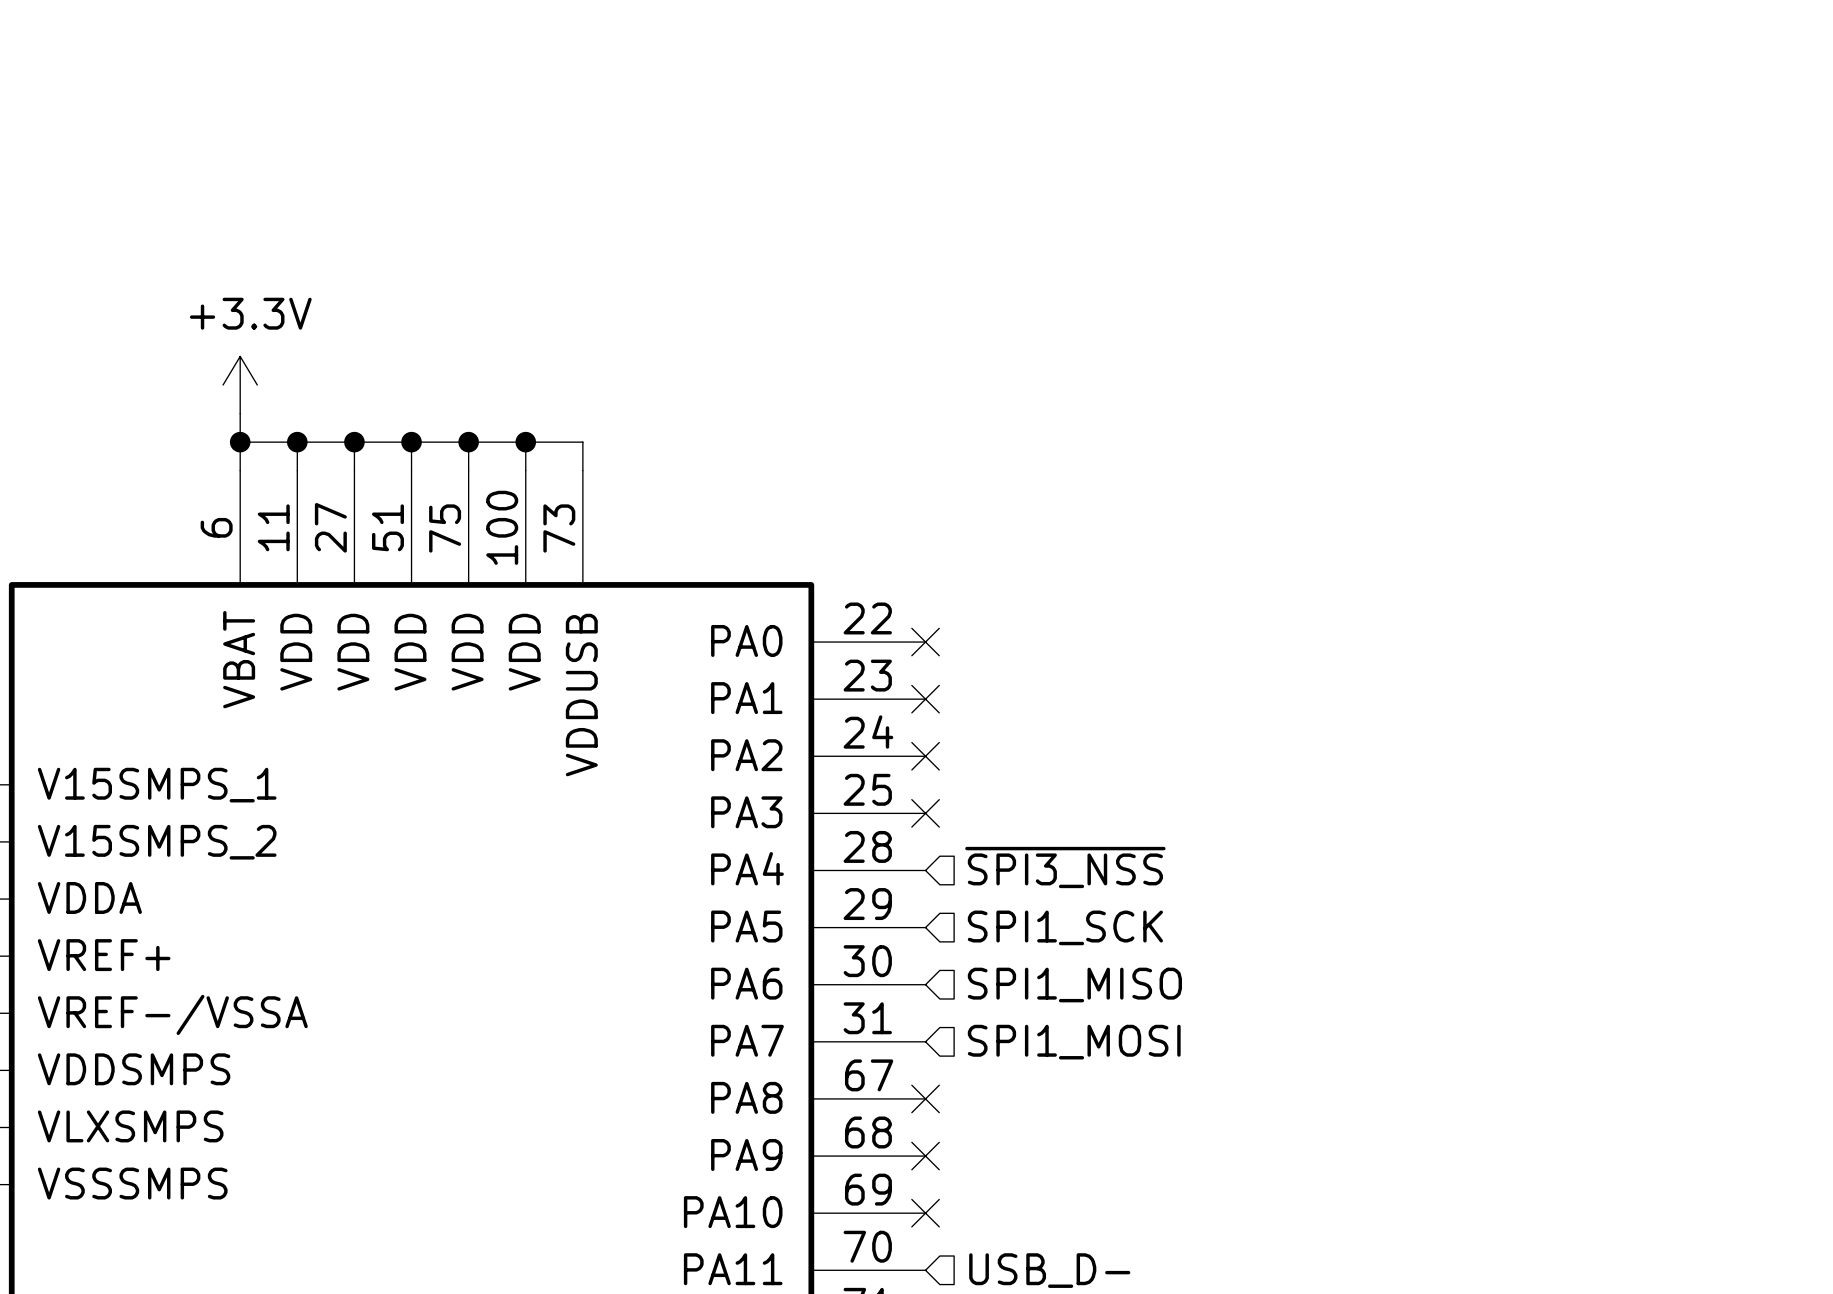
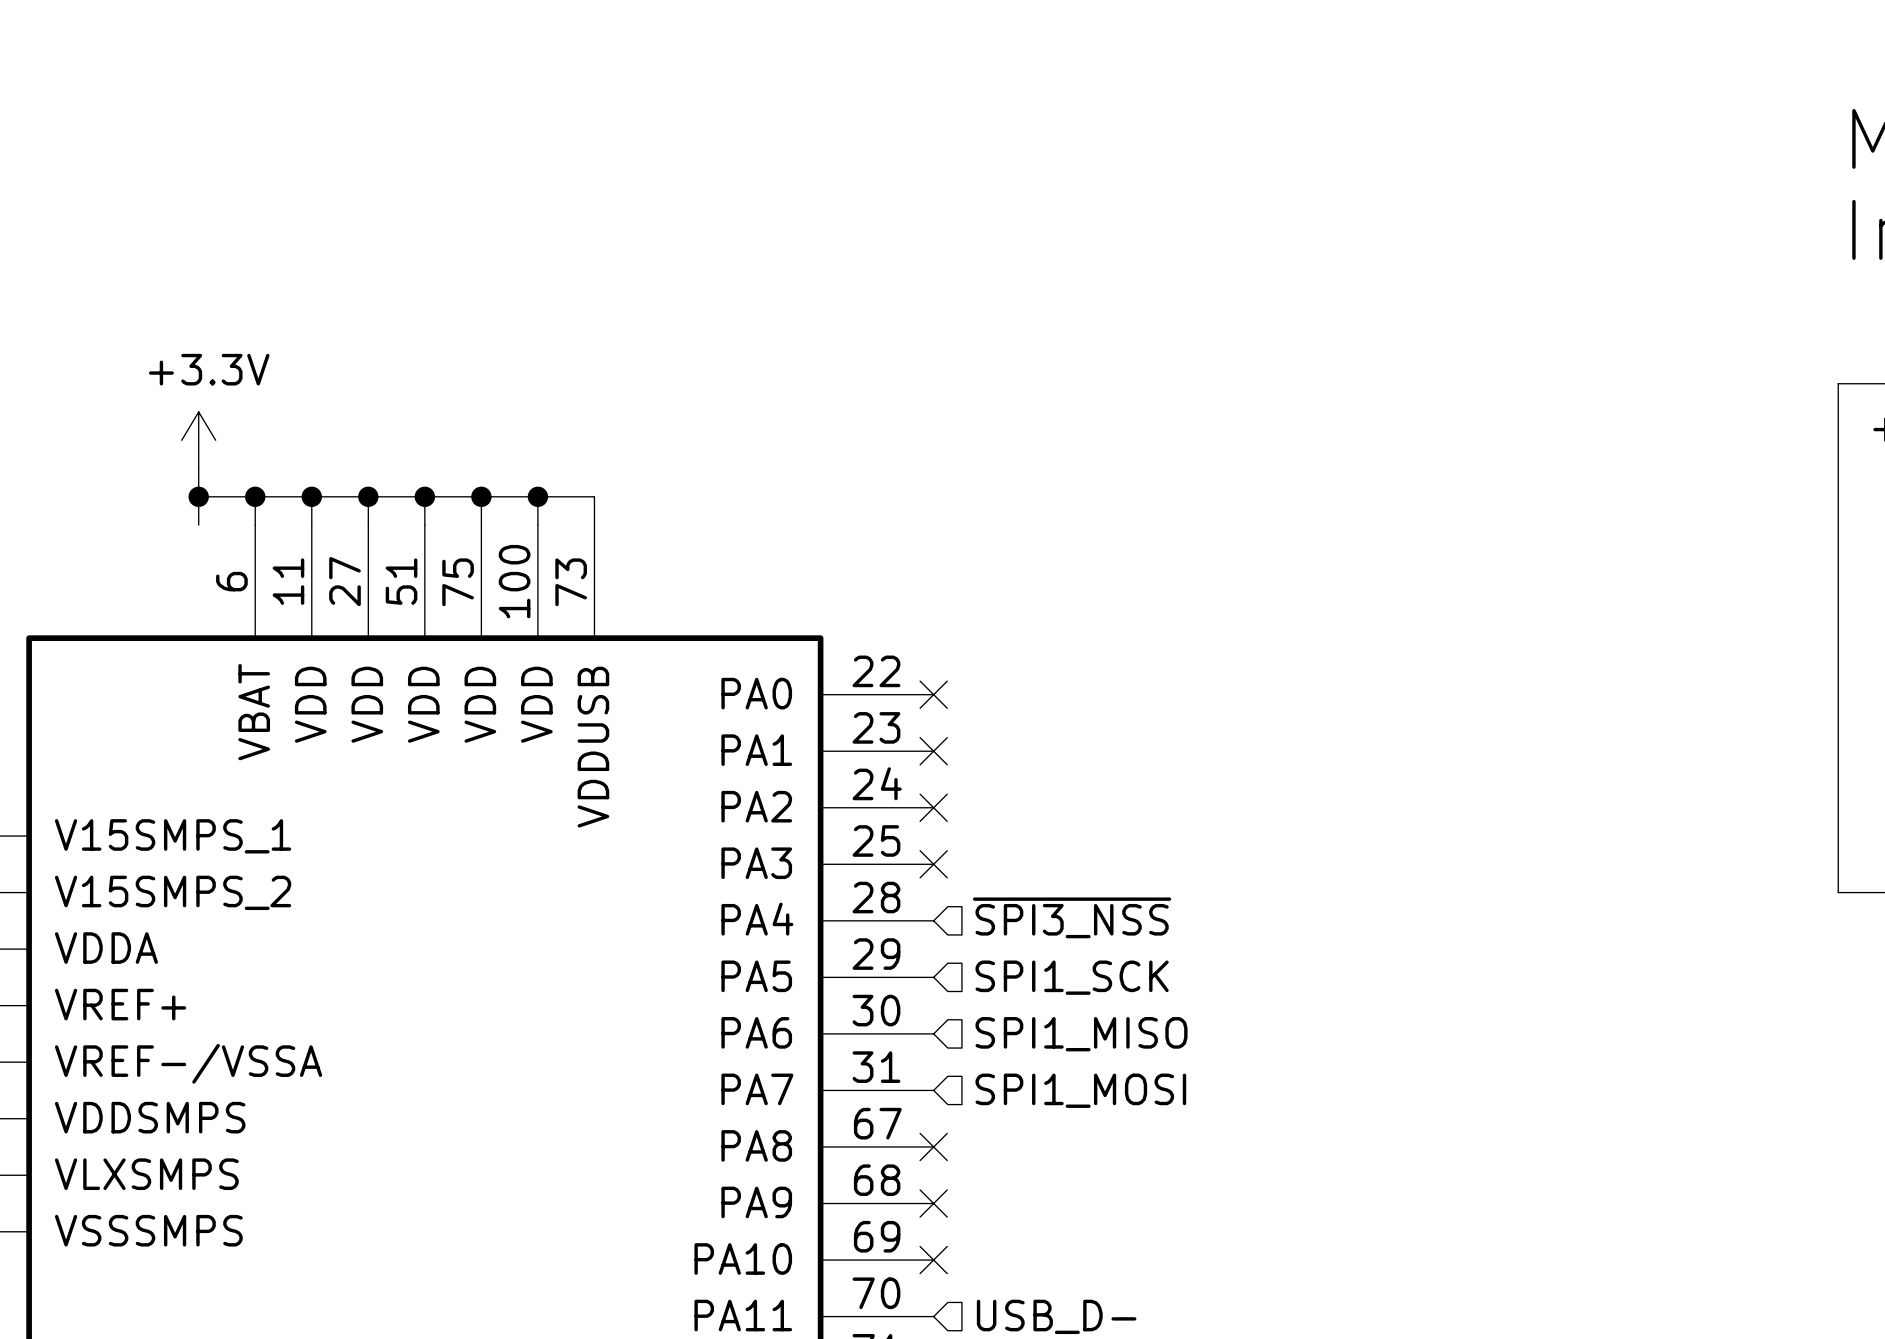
power symbol position: +3.3V (240, 385) -> +3.3V (198, 440)
wire: none -> (198, 468) (198, 525)
wire: (240, 413) (240, 442) -> (198, 496) (255, 496)
junction: none -> (198, 496)

